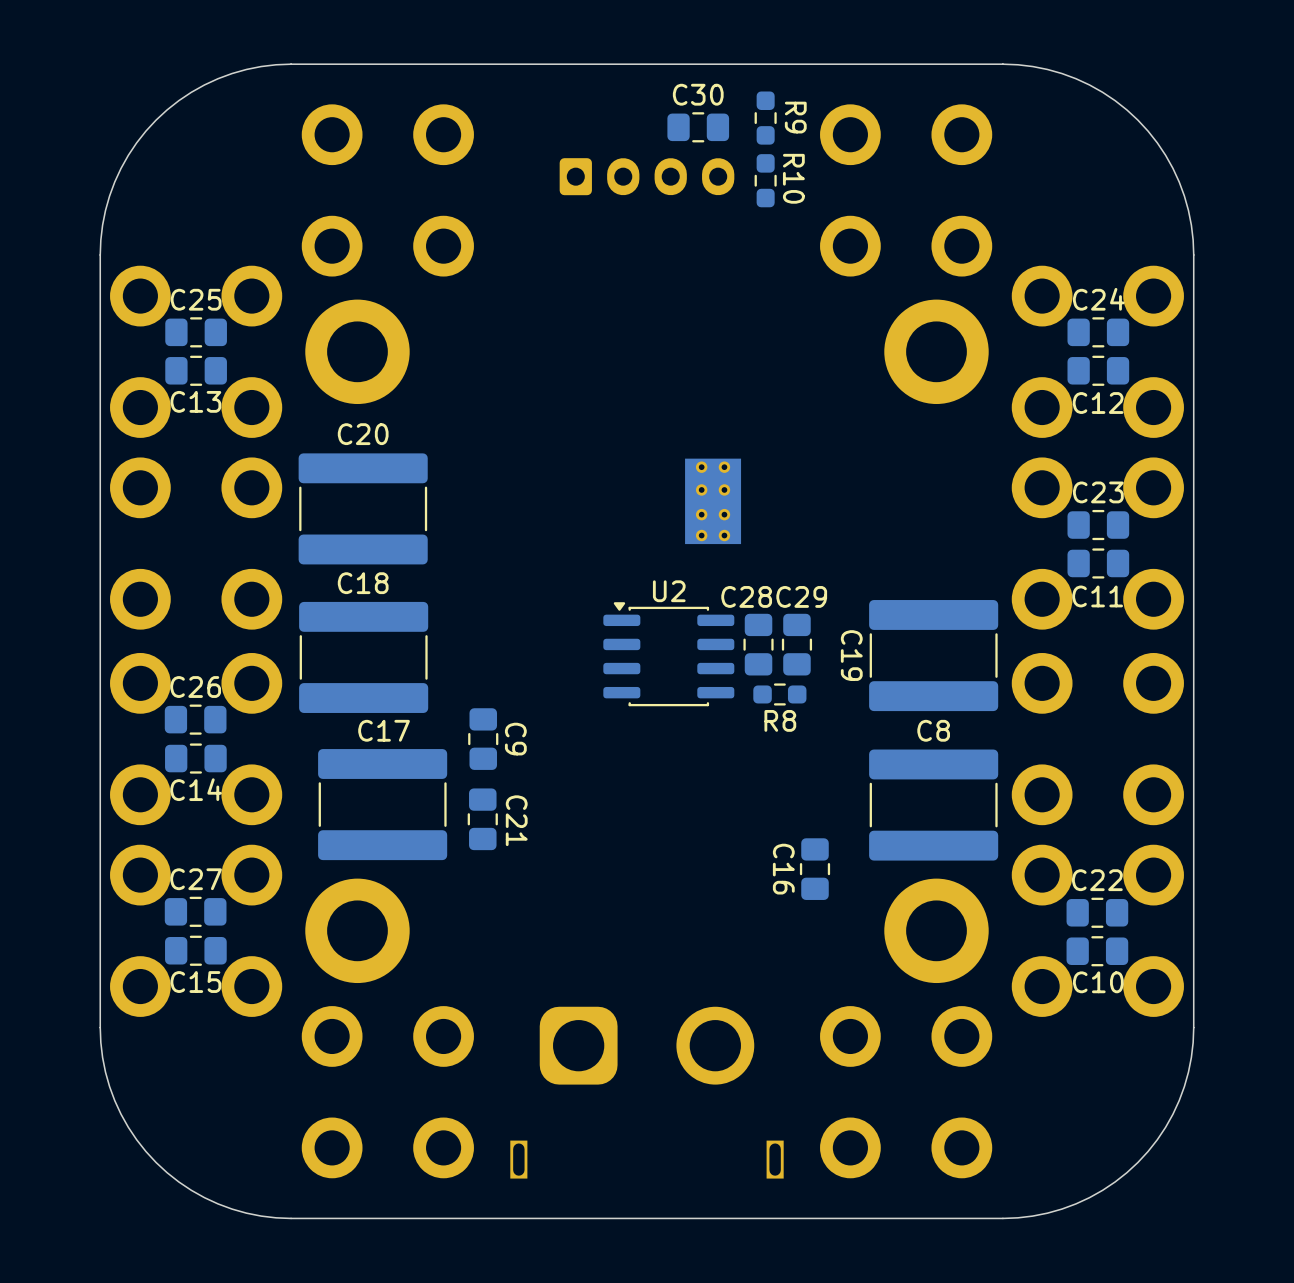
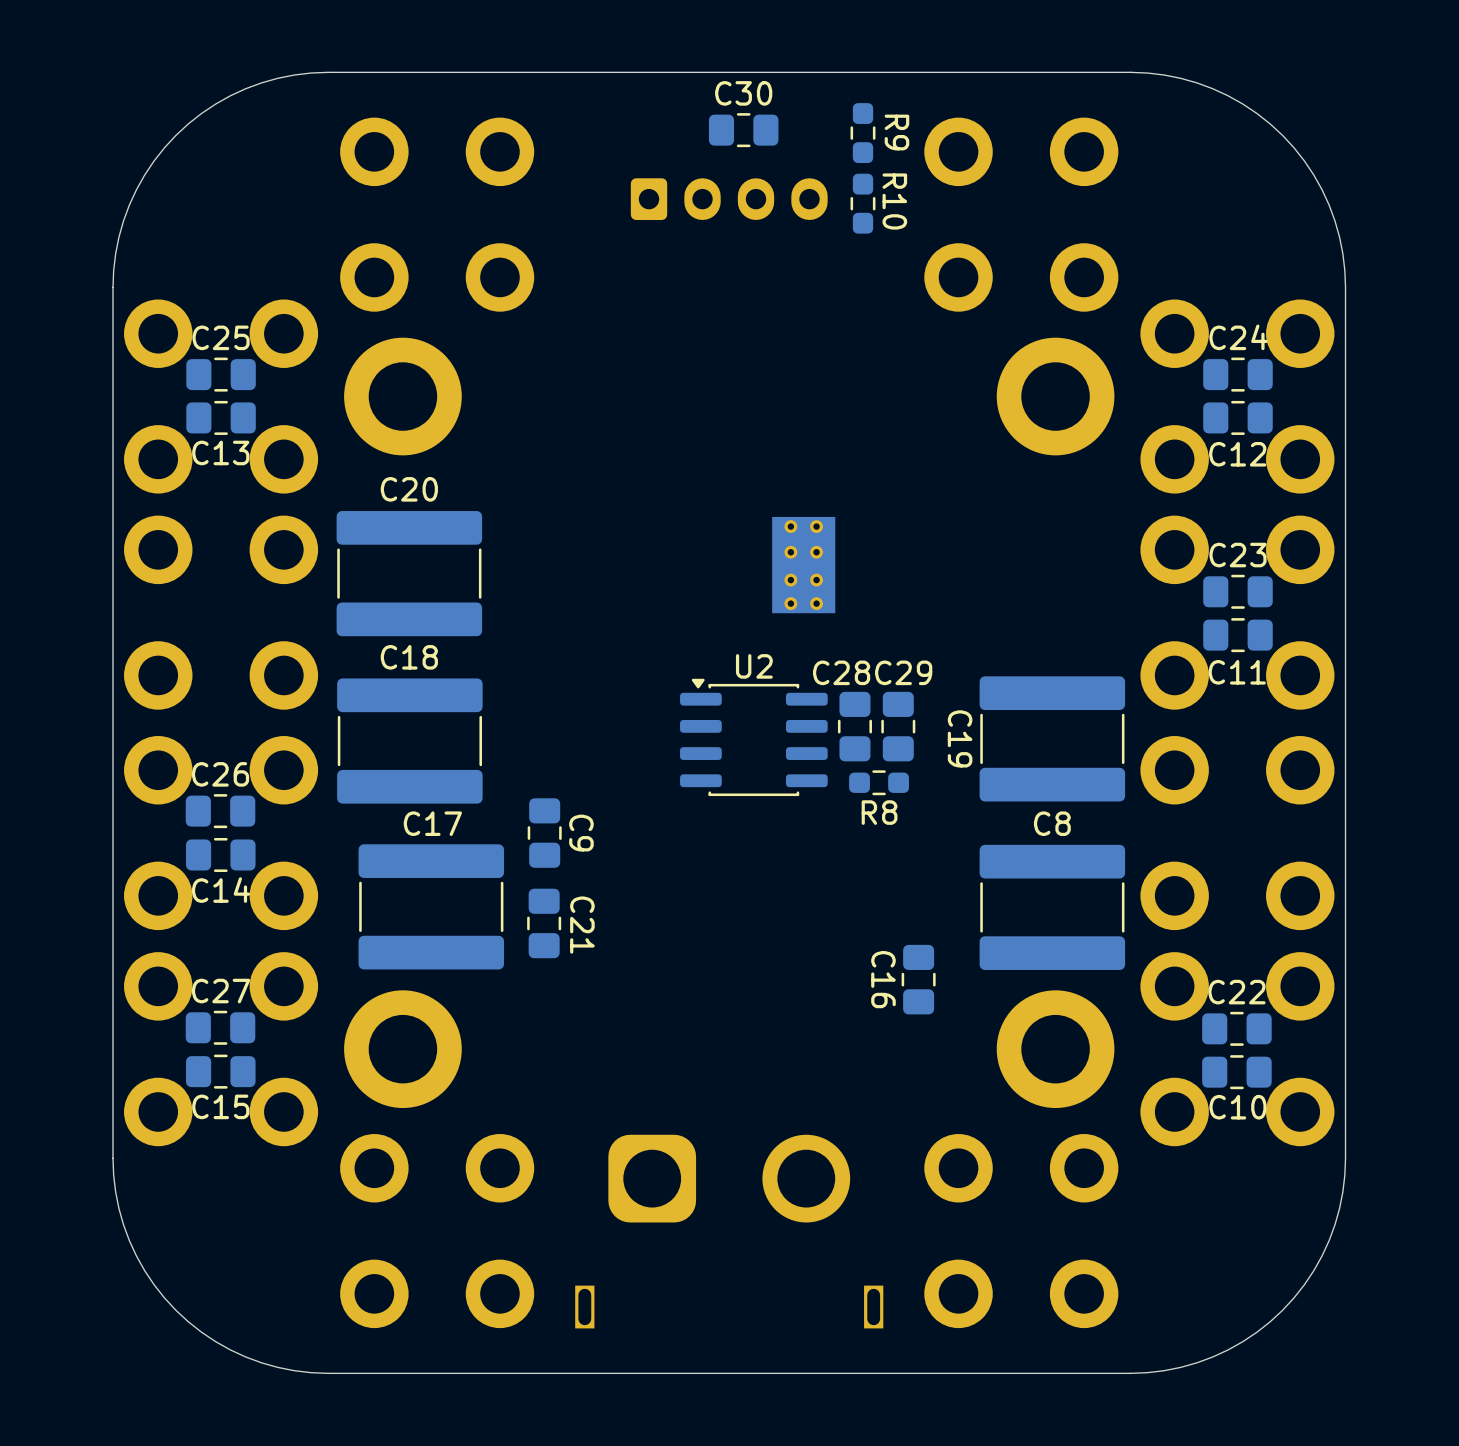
C30 position: (698, 127) -> (743, 130)

